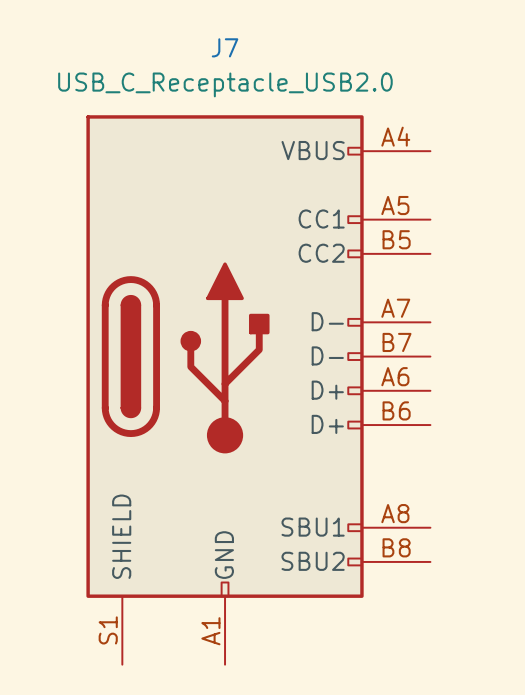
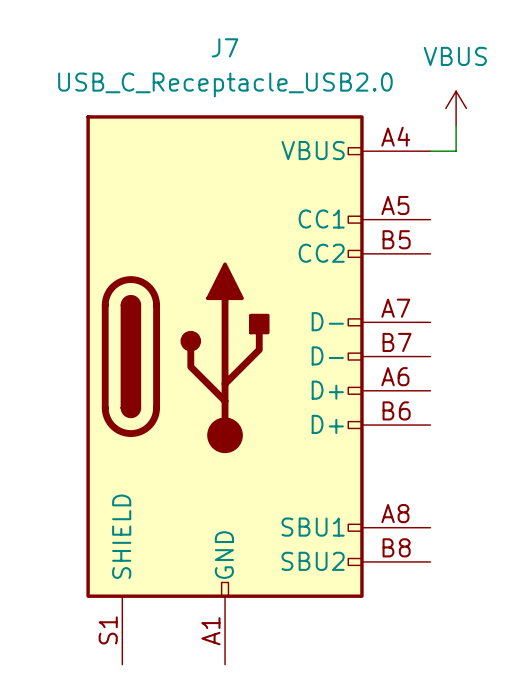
power symbol: none -> VBUS (456, 108)
wire: none -> (456, 125) (456, 151) (430, 151)

